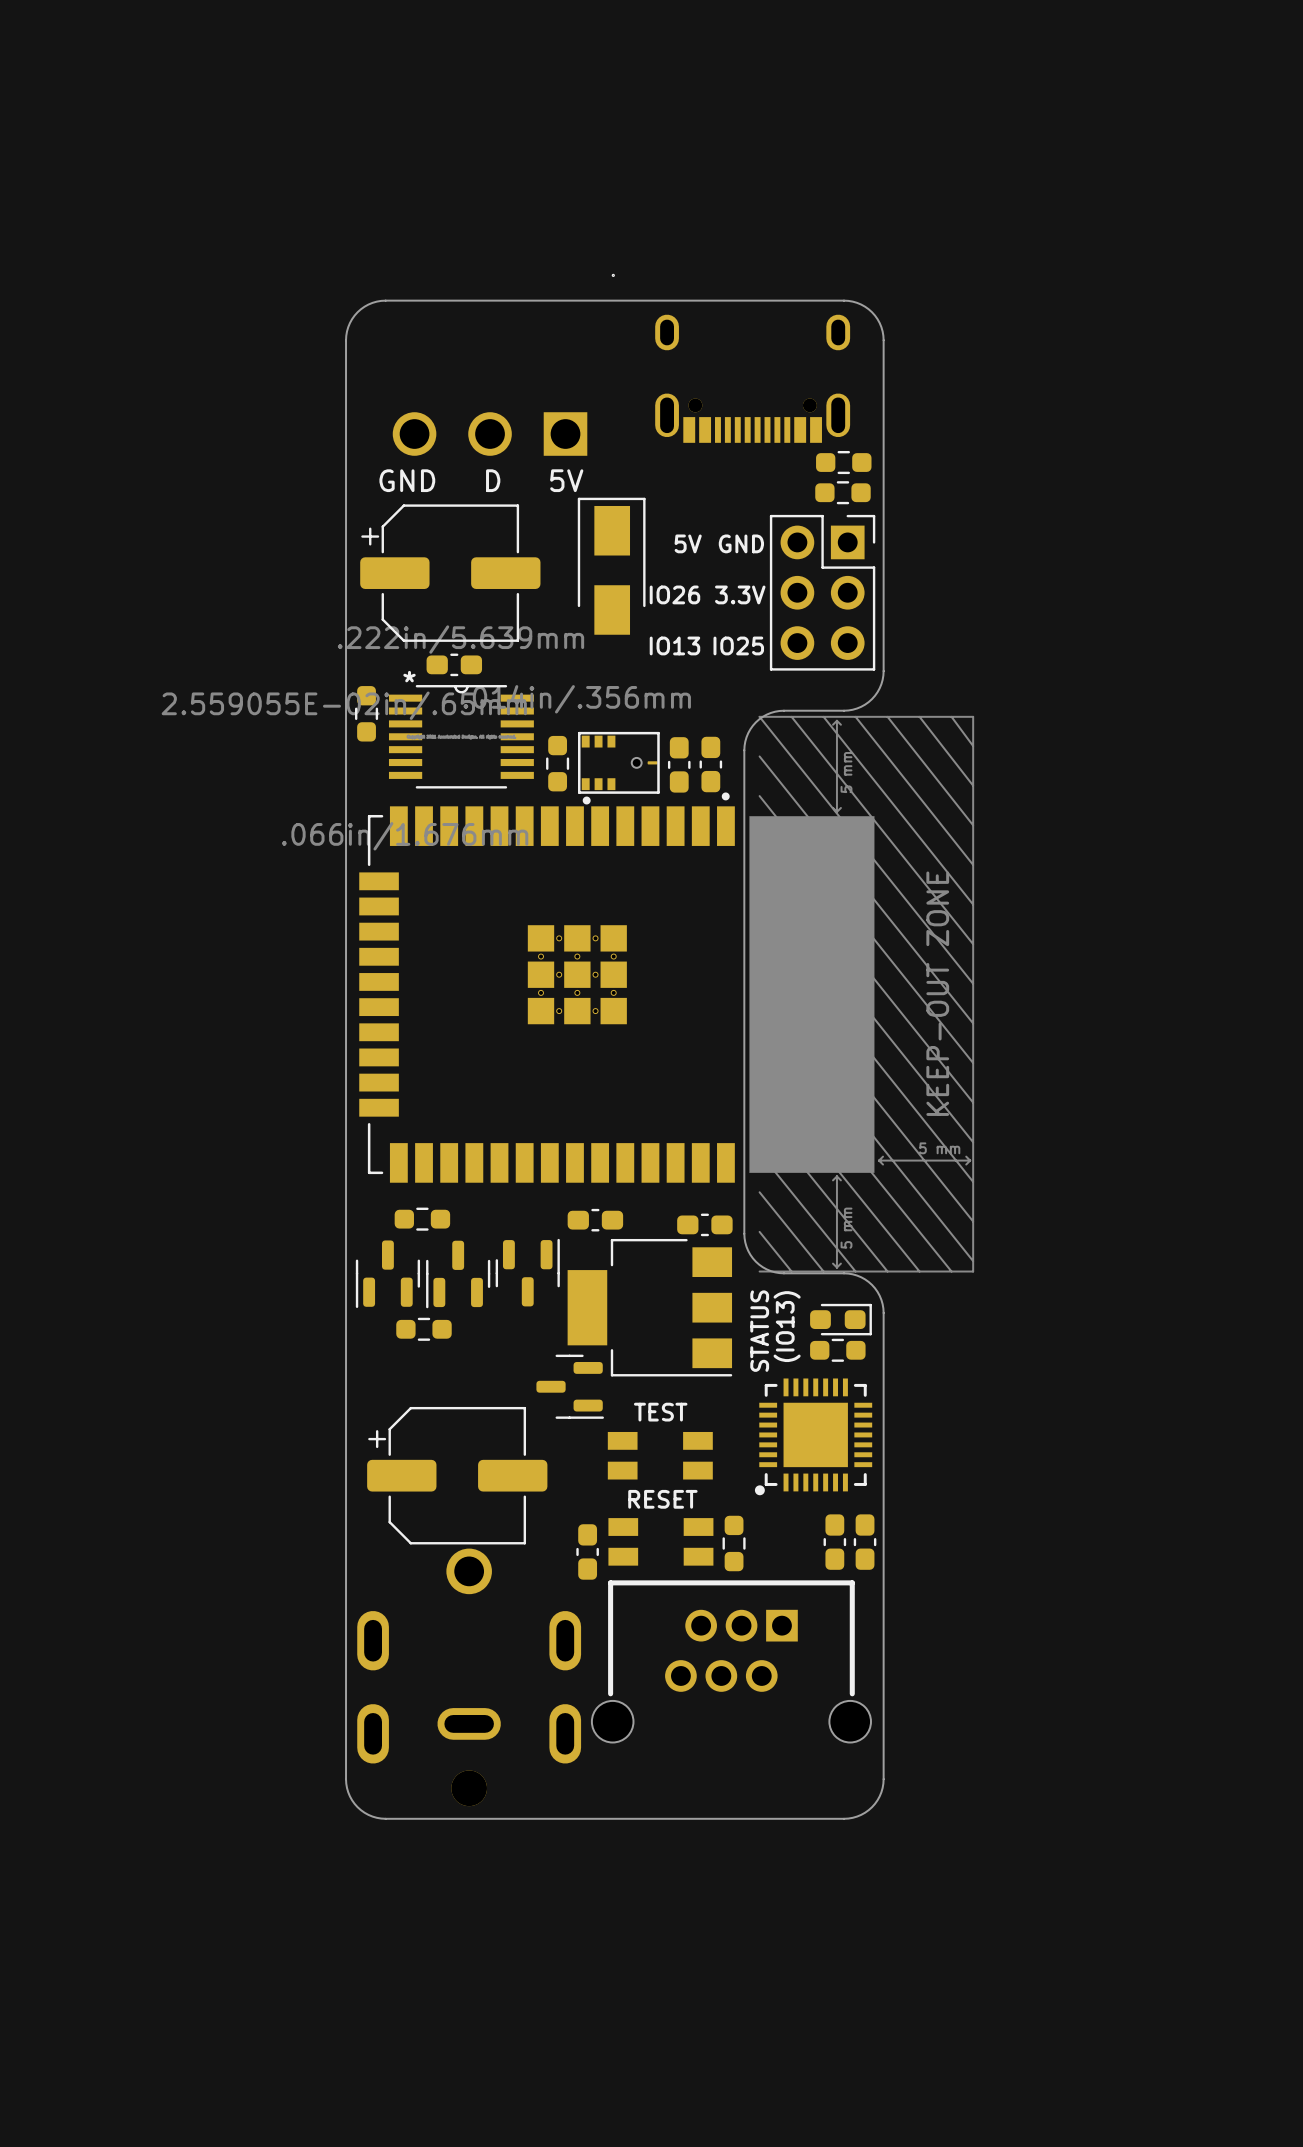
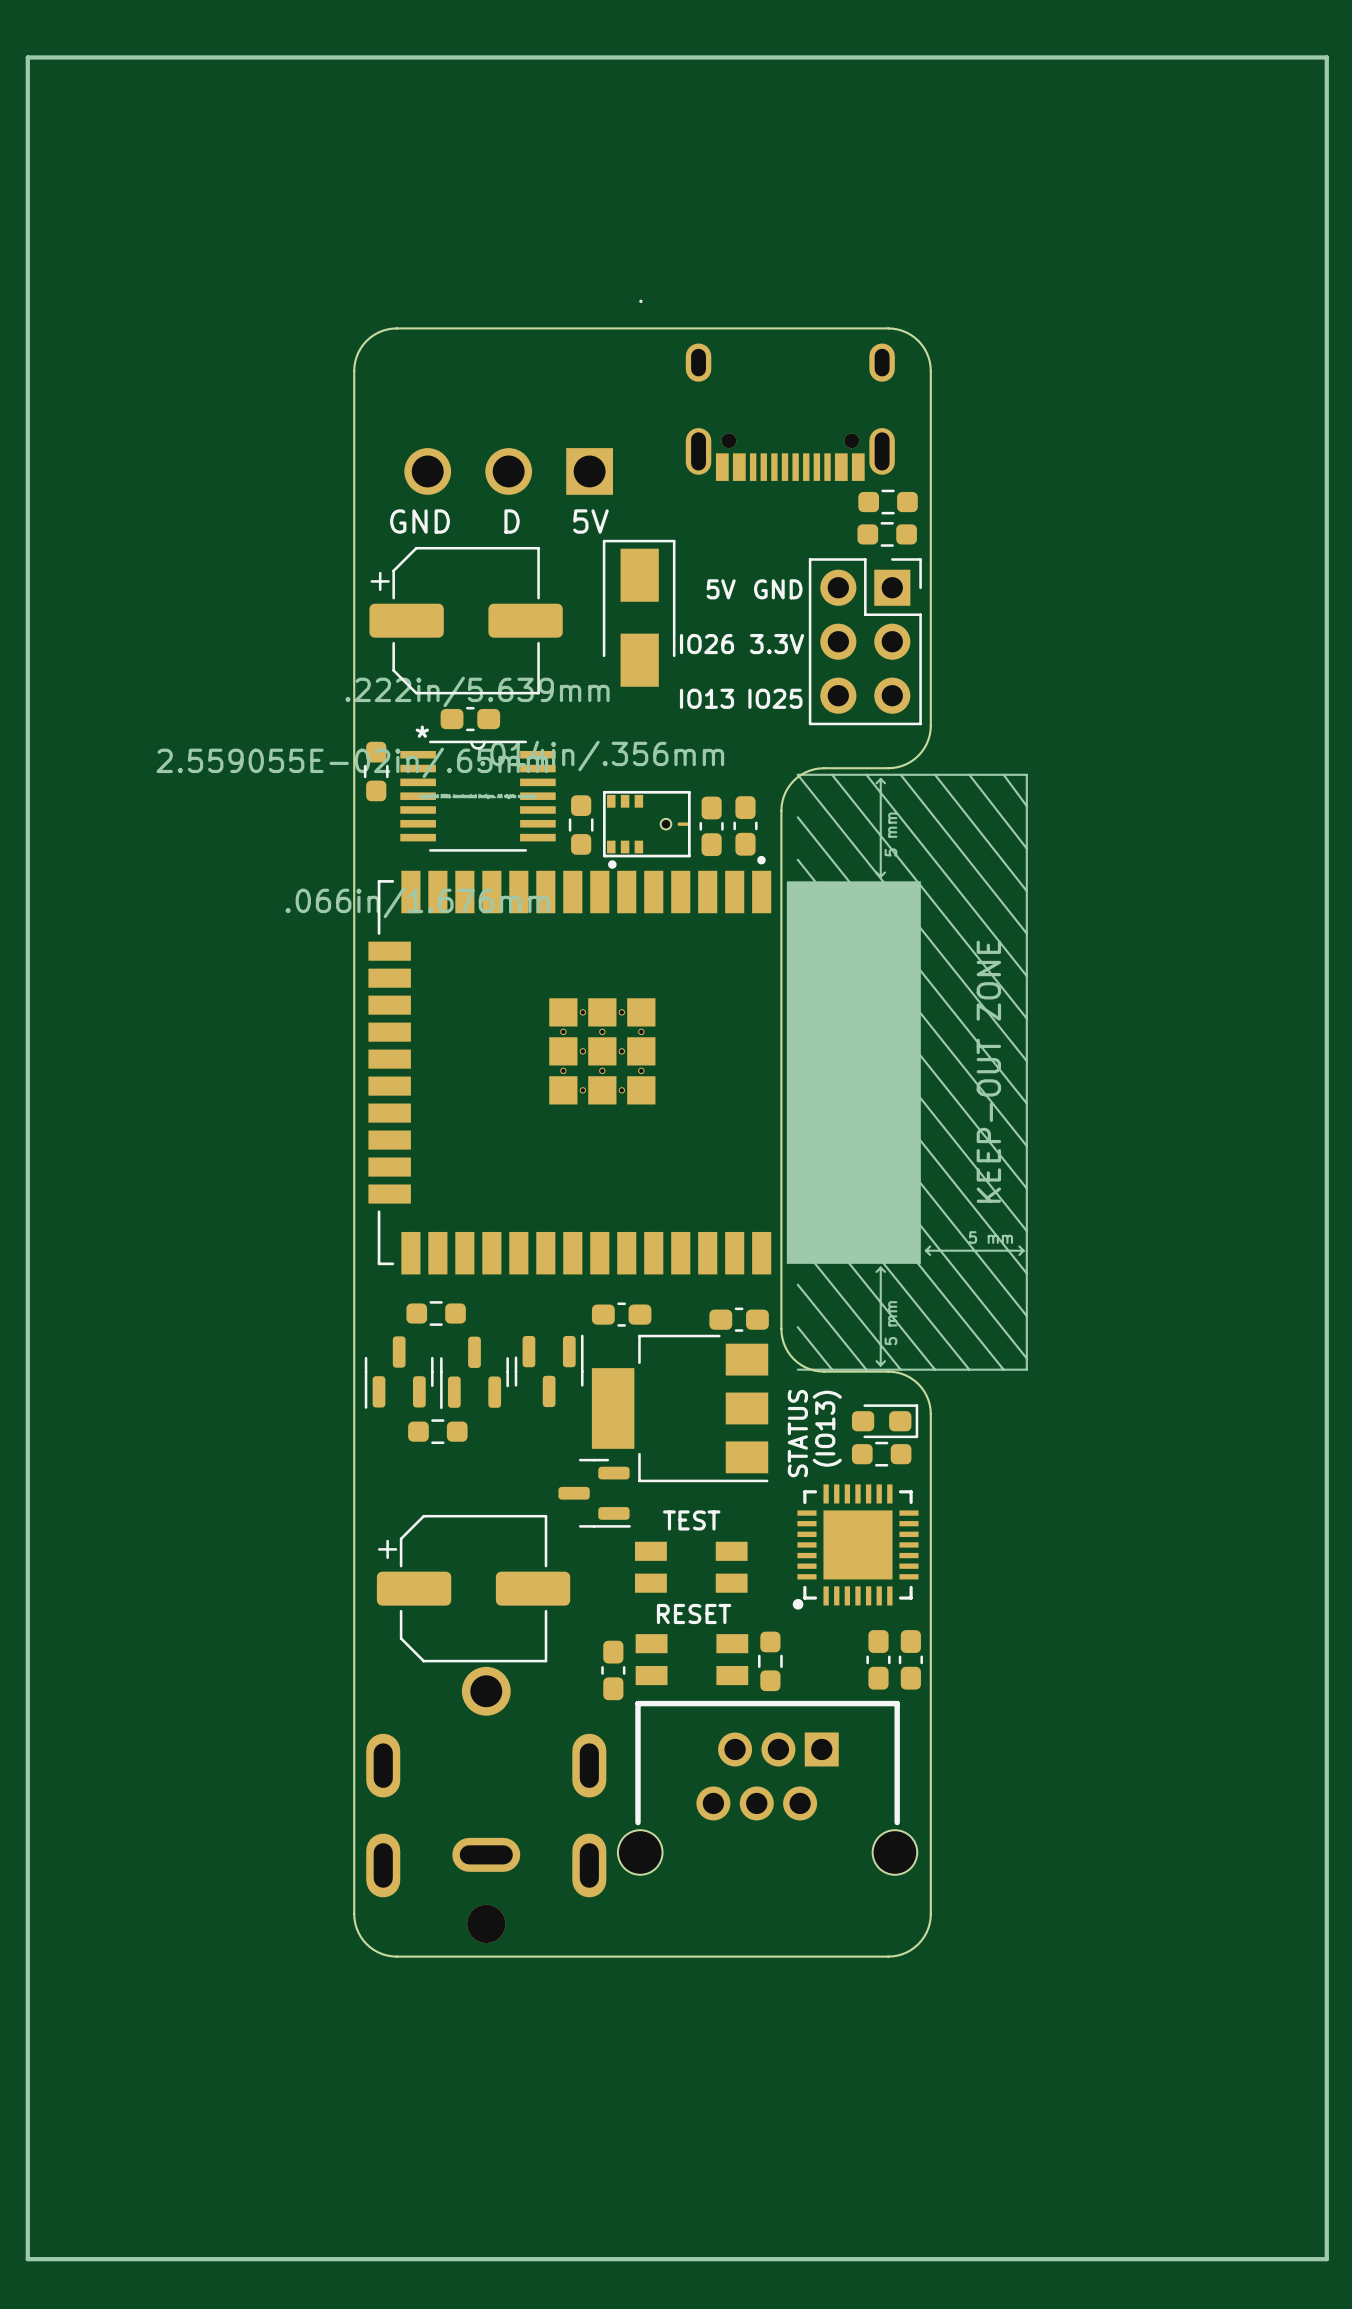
line: none -> (27, 57) (1326, 57) (1326, 2259) (27, 2259) (27, 57)

